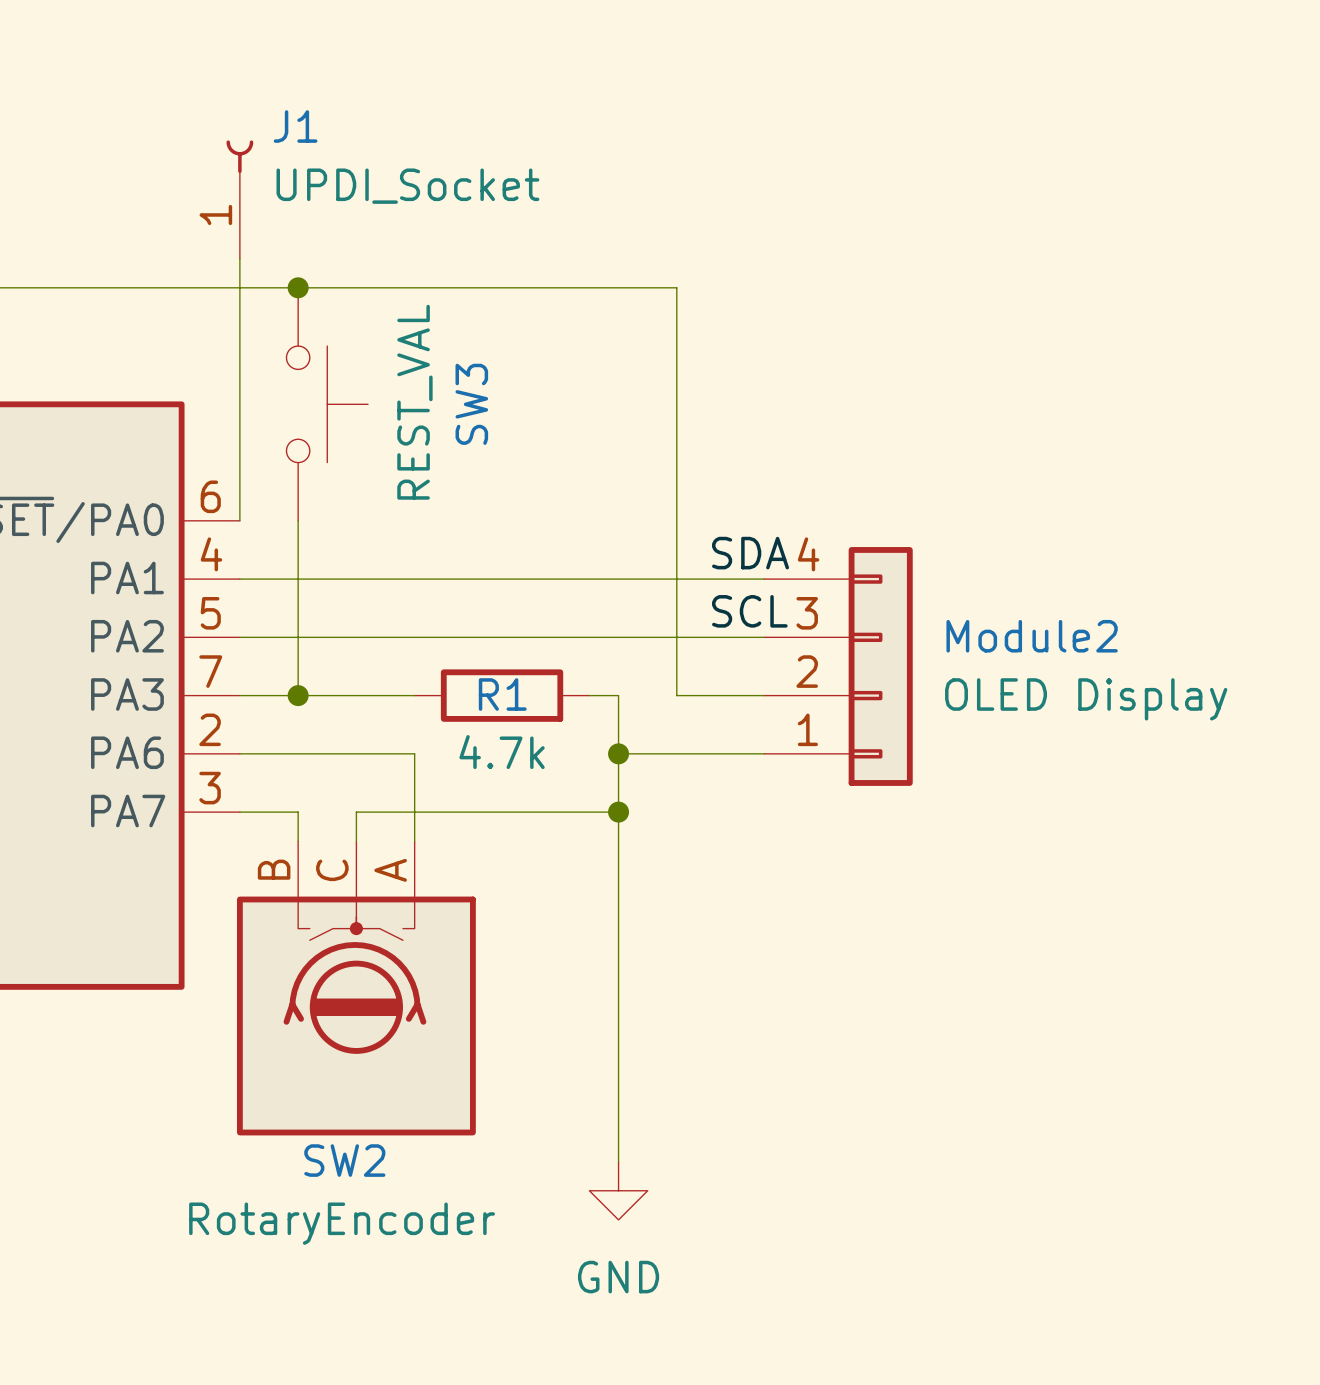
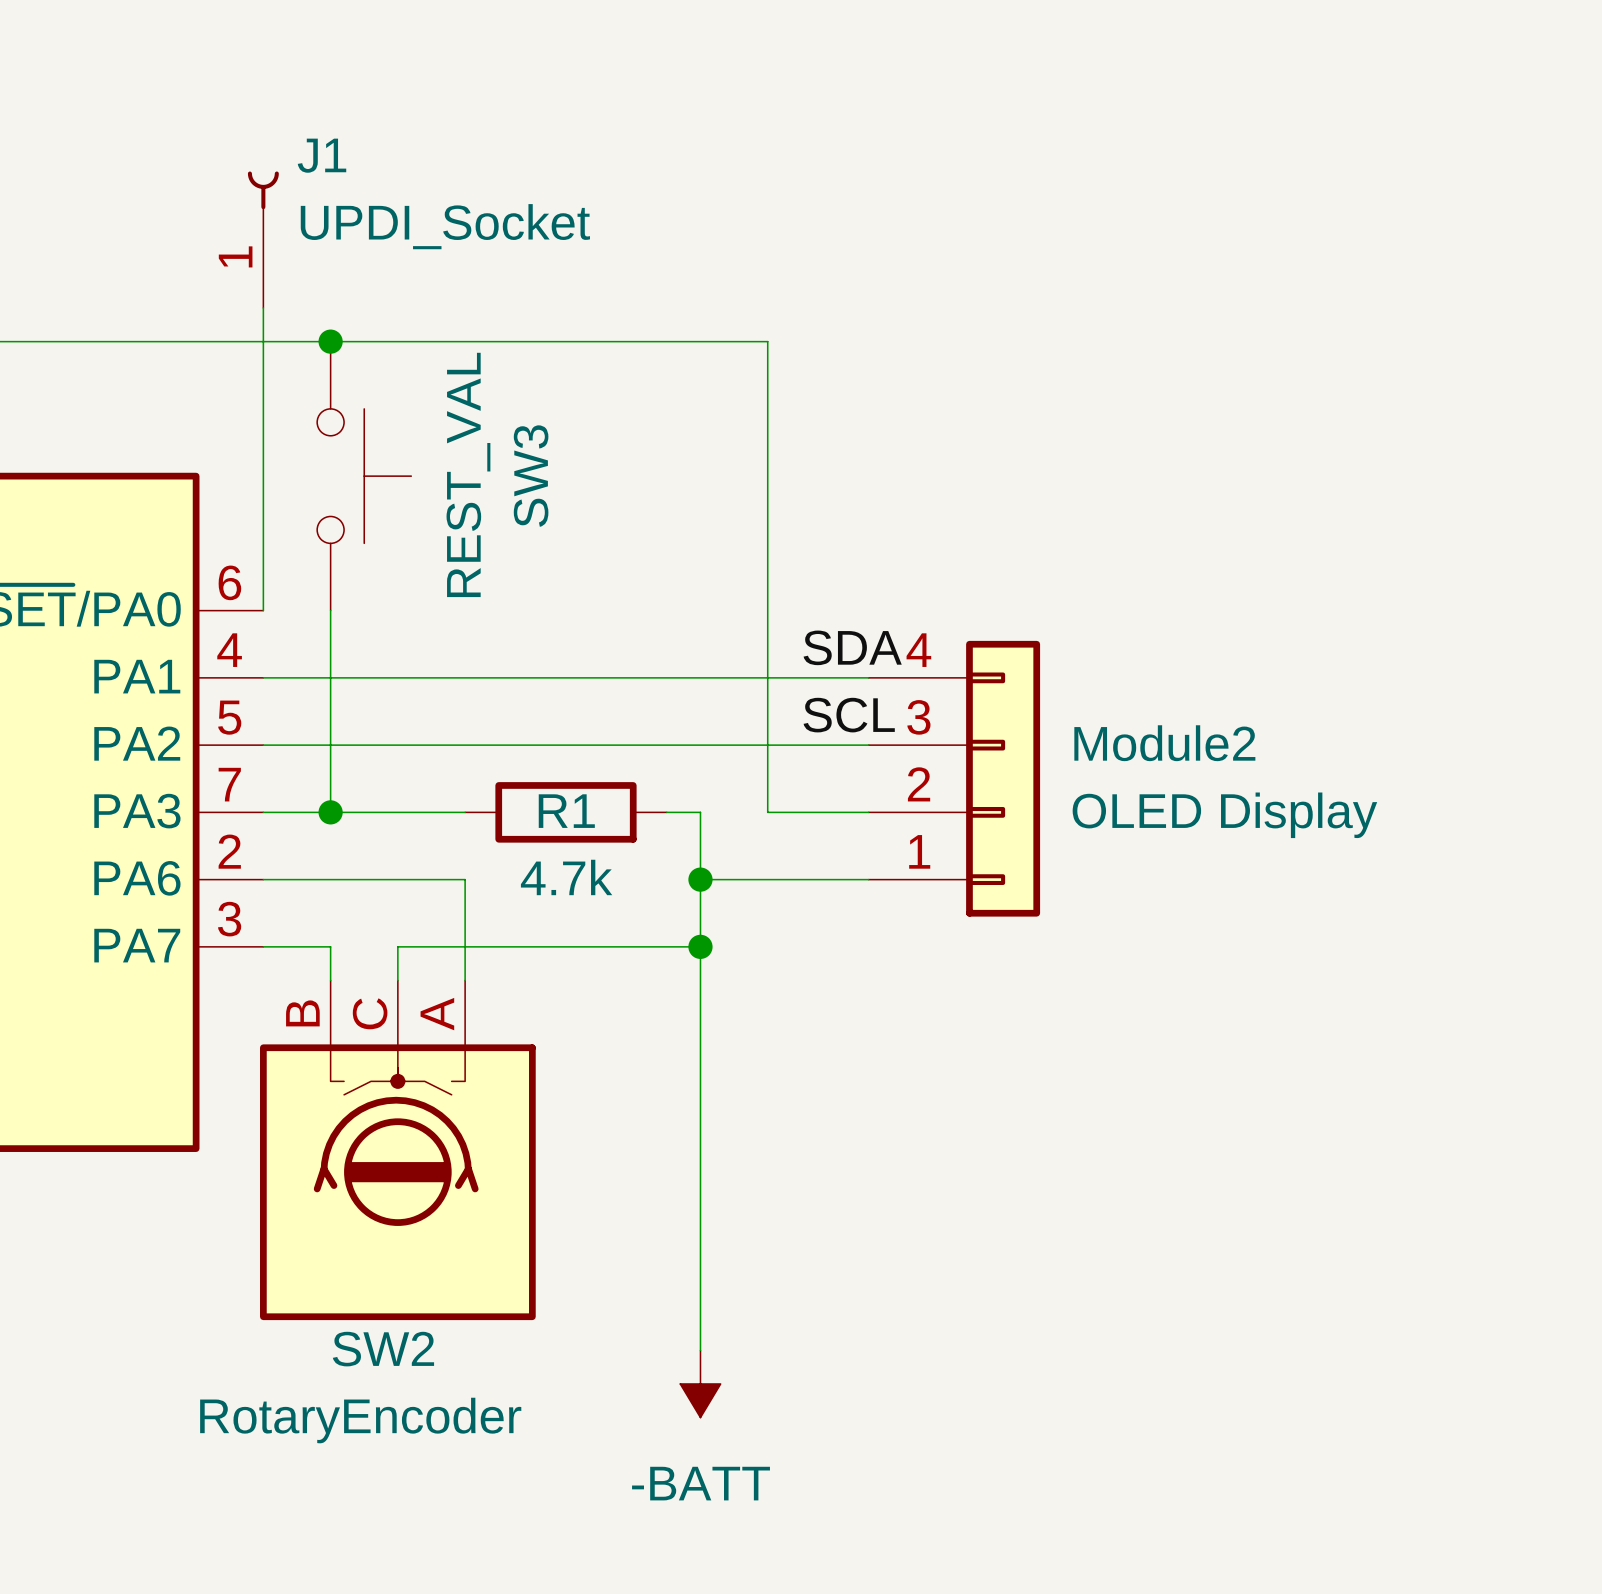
power symbol: GND (618, 1190) -> -BATT (700, 1383)

